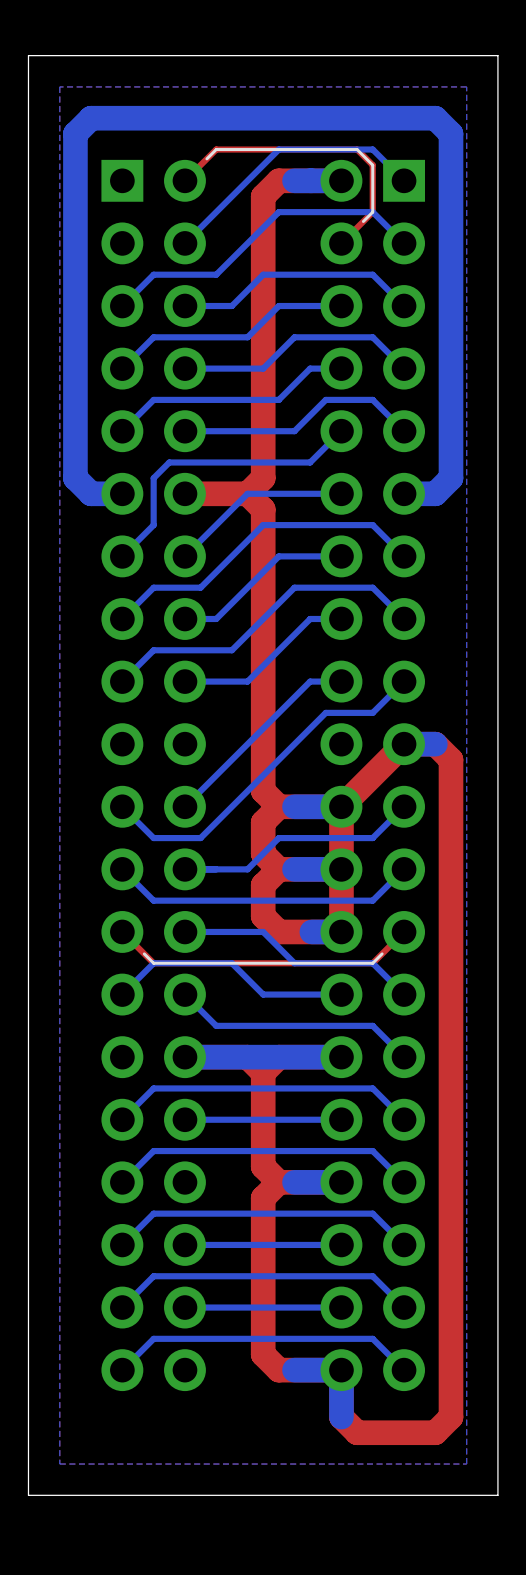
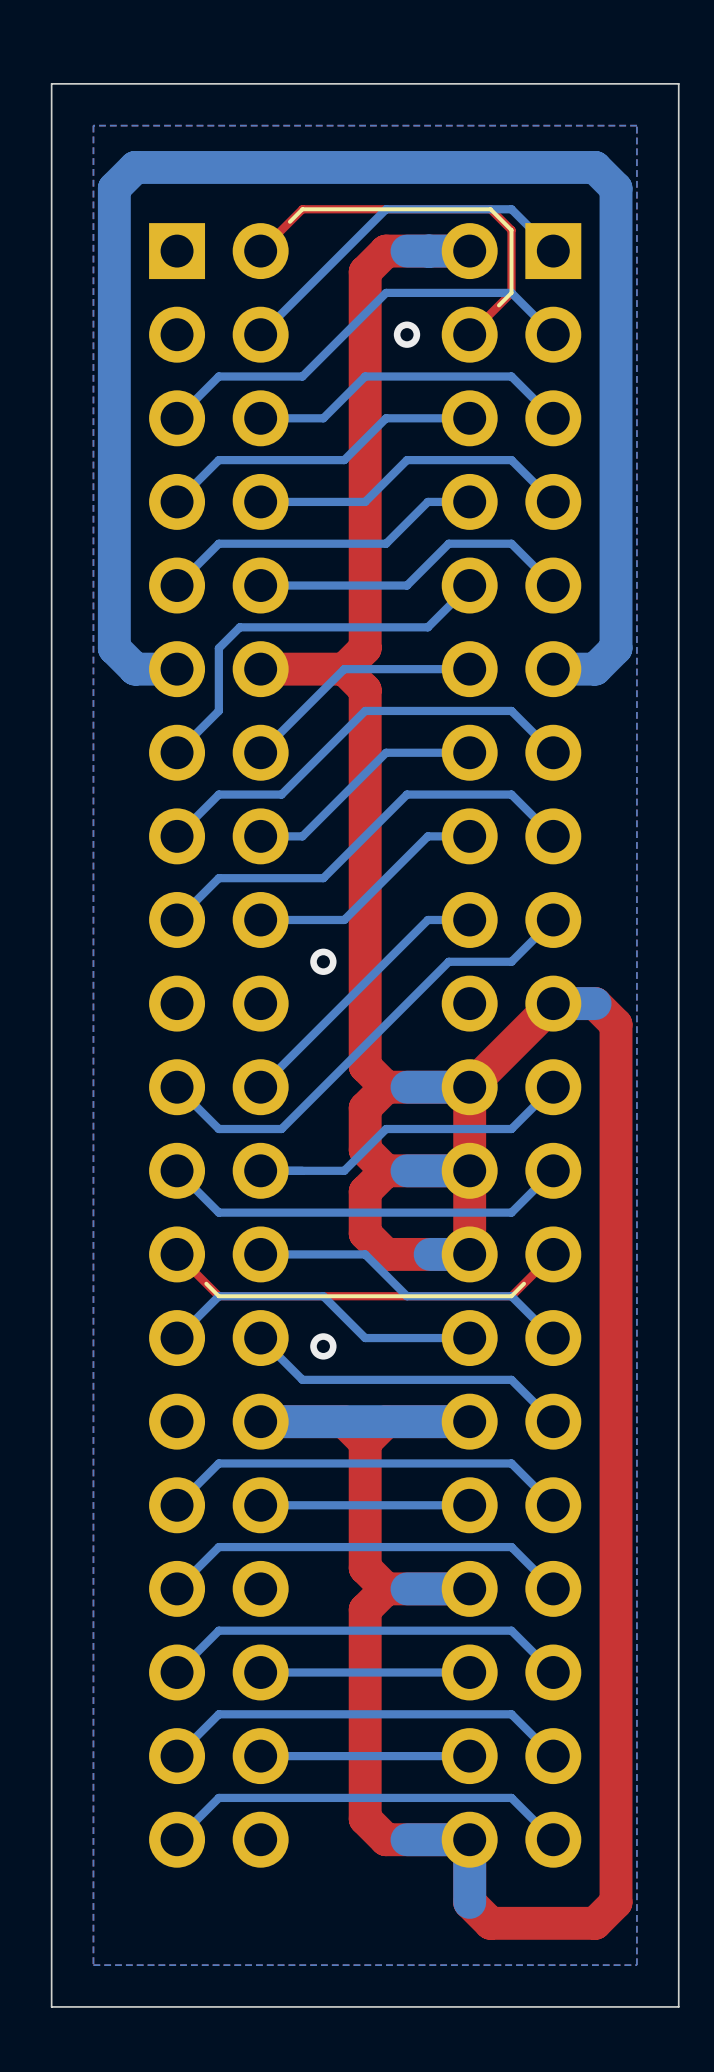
via: none -> (406, 334)
via: none -> (323, 961)
via: none -> (323, 1346)

